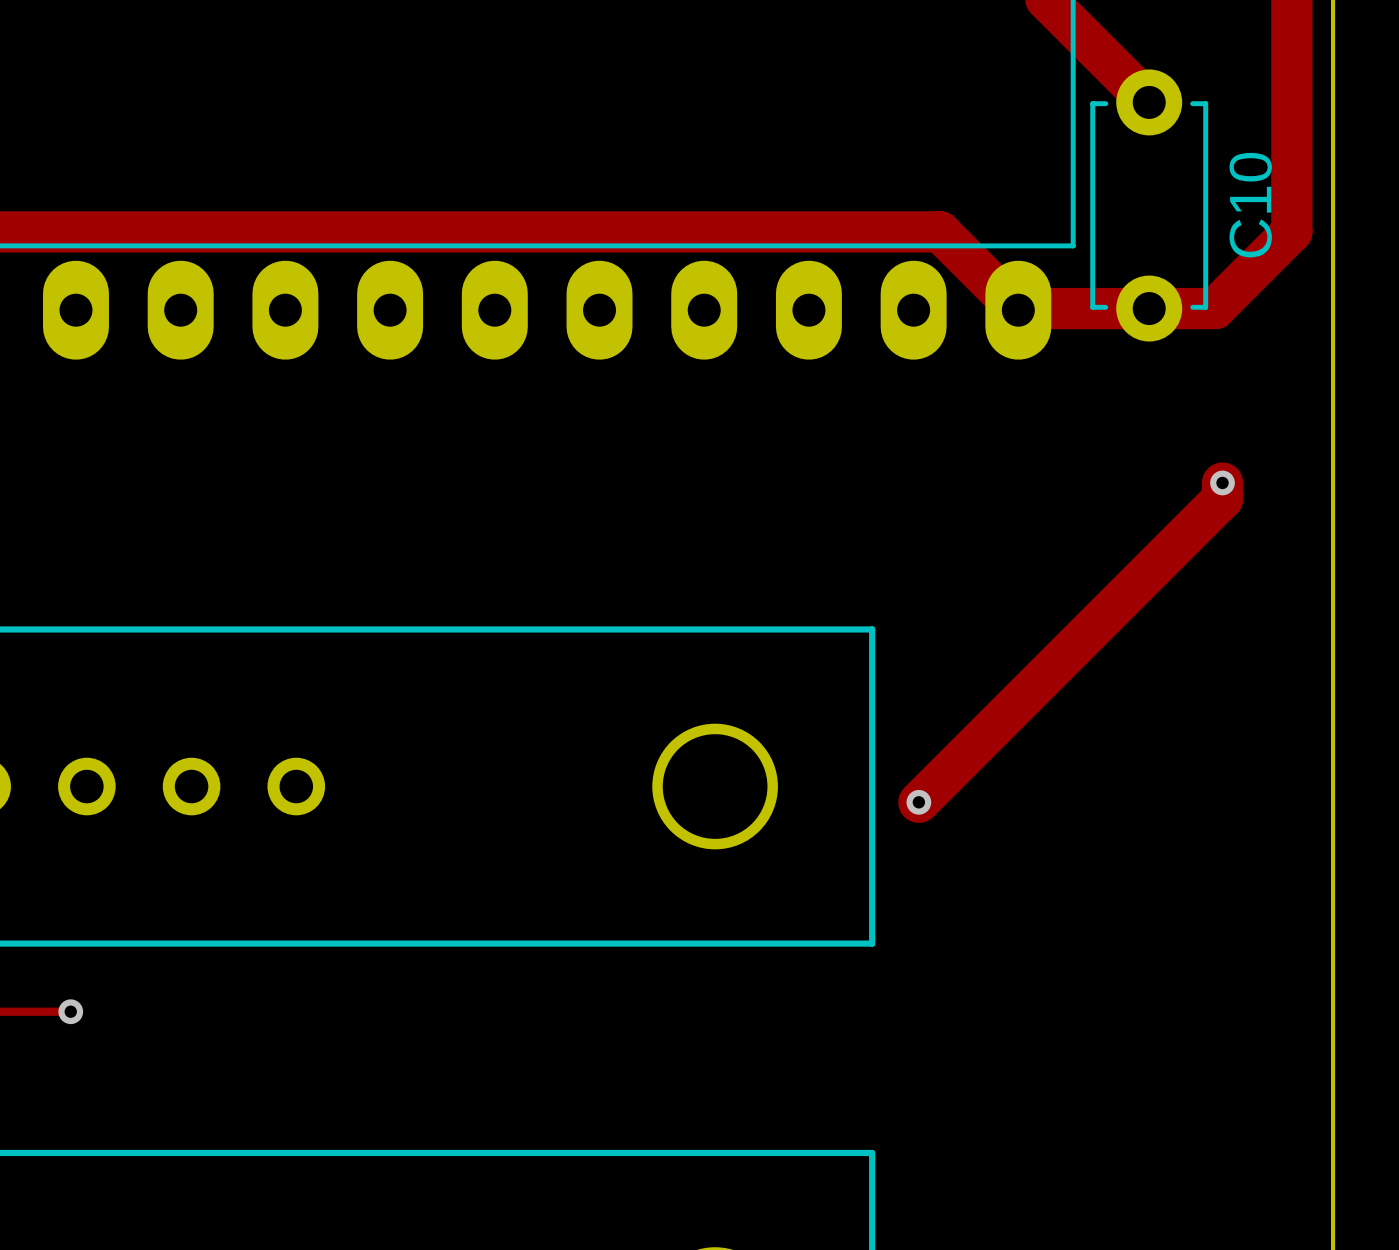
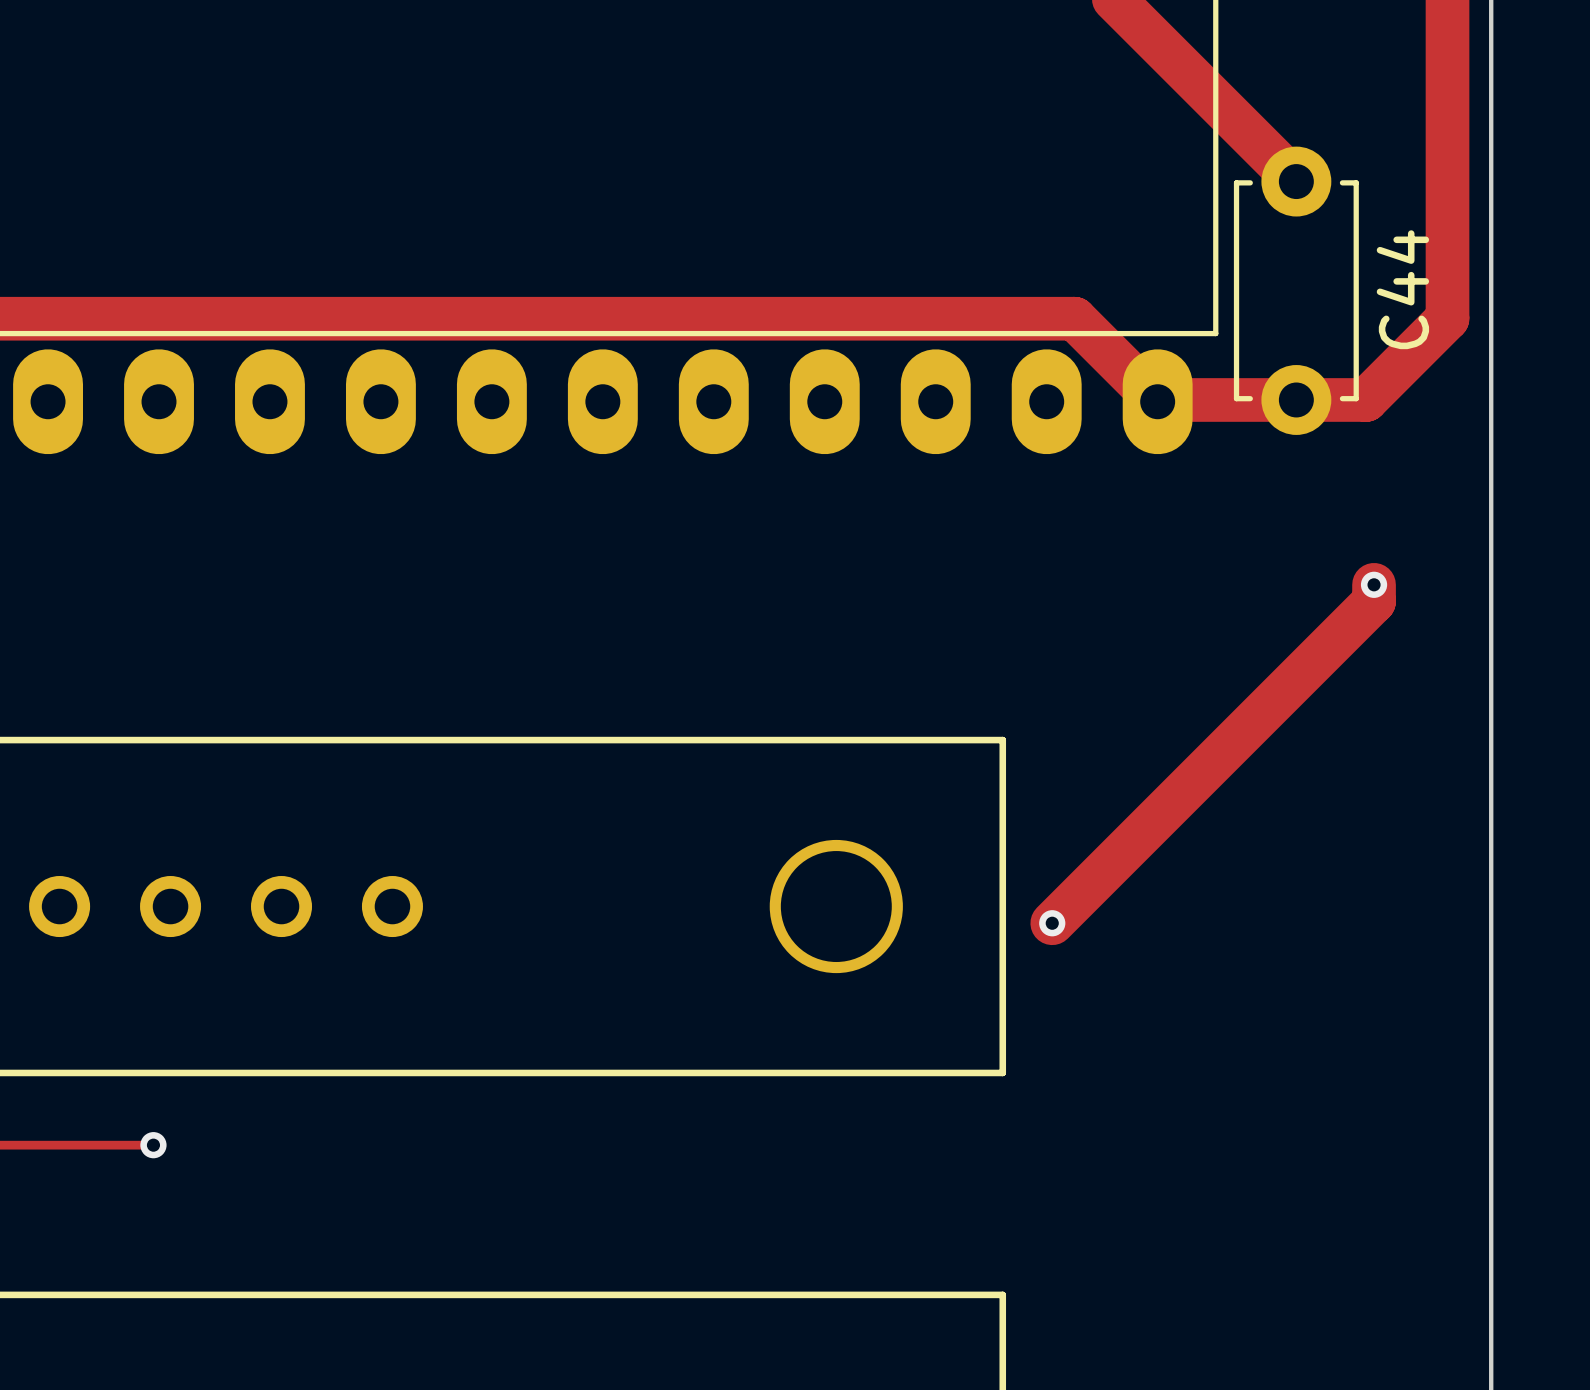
C10 name: C10 (1250, 205) -> C44 (1402, 289)

